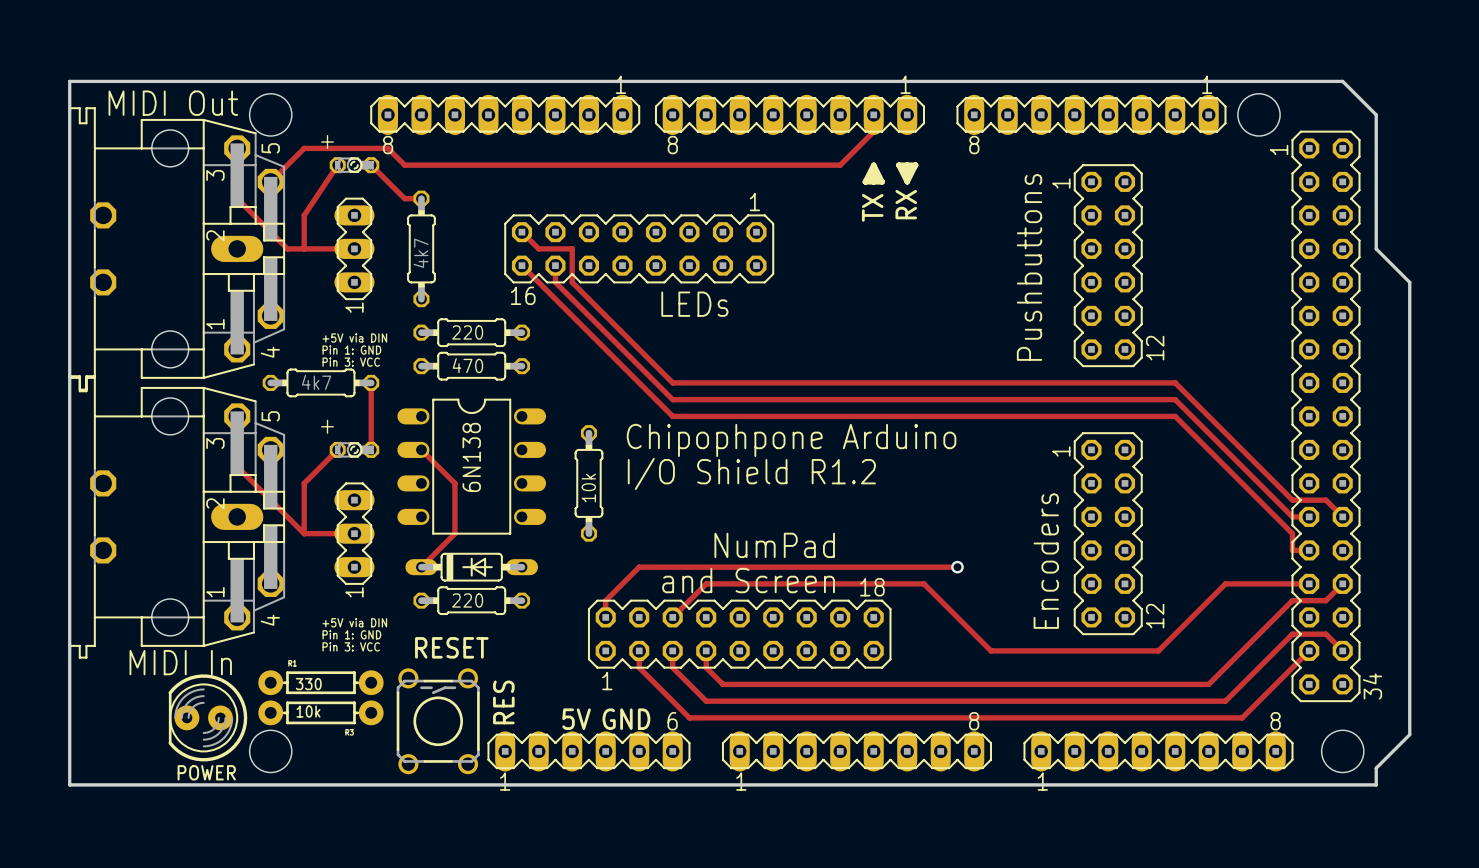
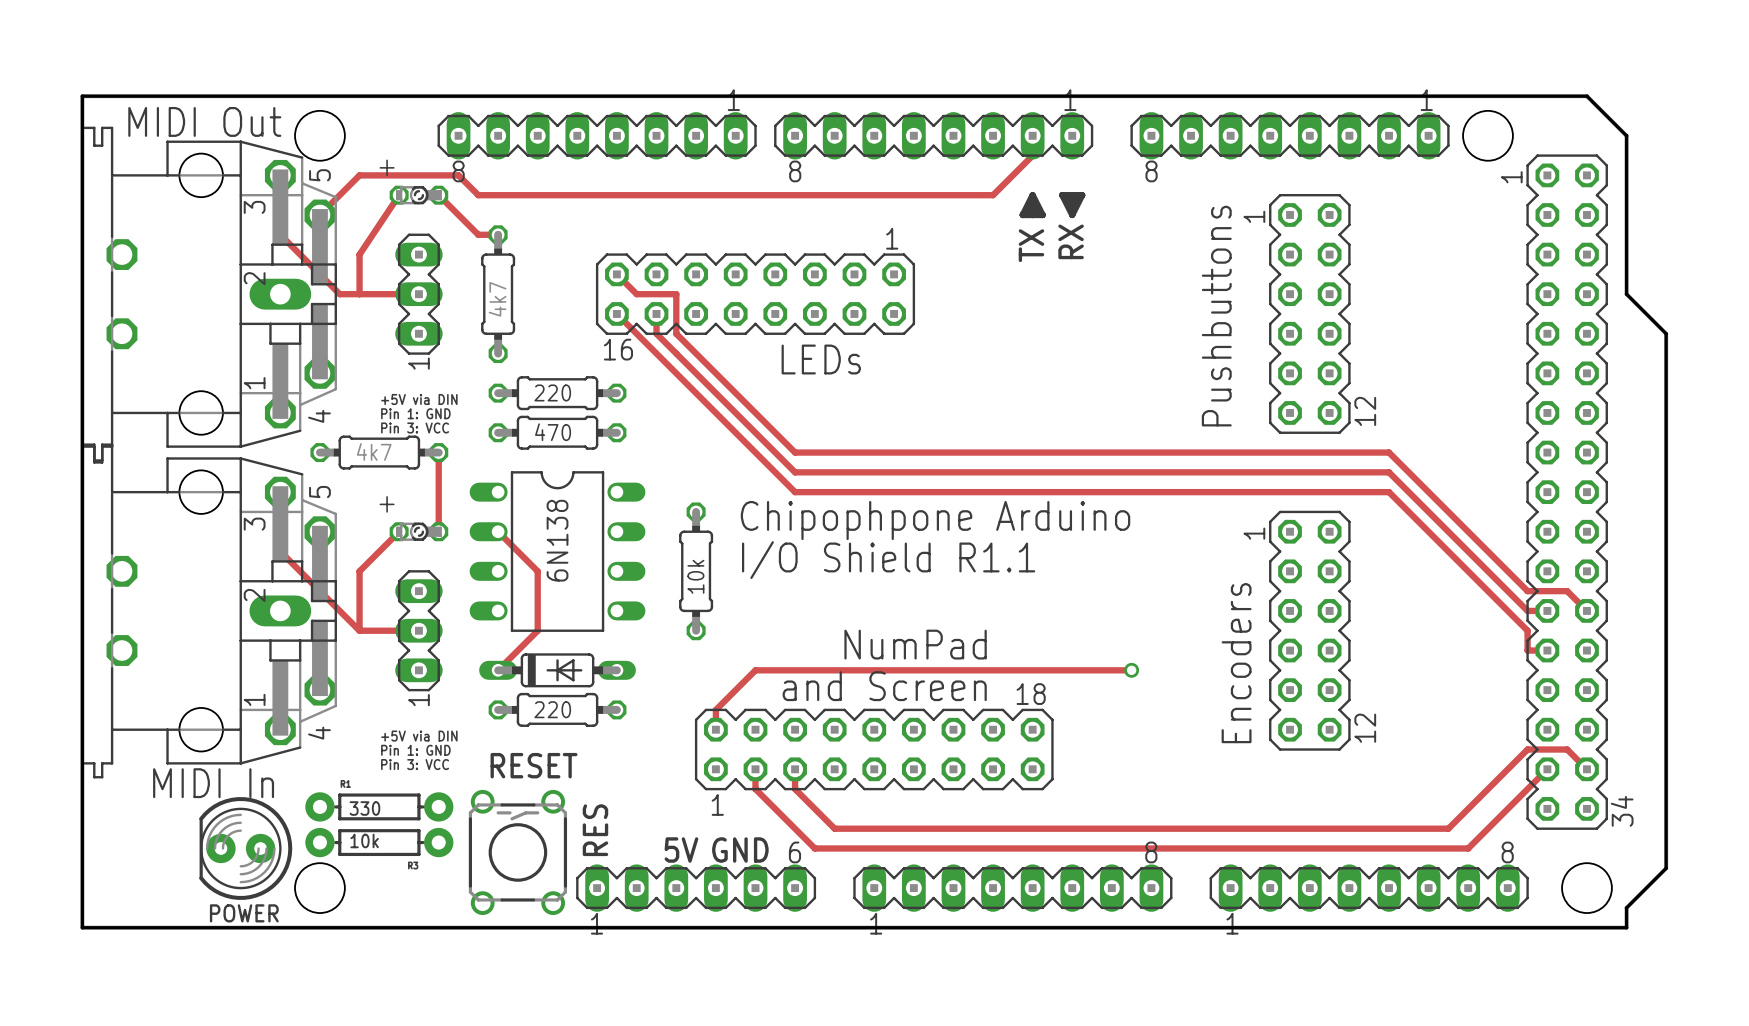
text: I/O Shield R1.2 (751, 473) -> I/O Shield R1.1 (888, 560)
track: (1309, 583) (1225, 583) (1158, 650) (990, 650) (923, 583) (706, 583) (672, 617) -> none
track: (1342, 583) (1325, 600) (1292, 600) (1208, 684) (722, 684) (706, 667) (706, 650) -> none

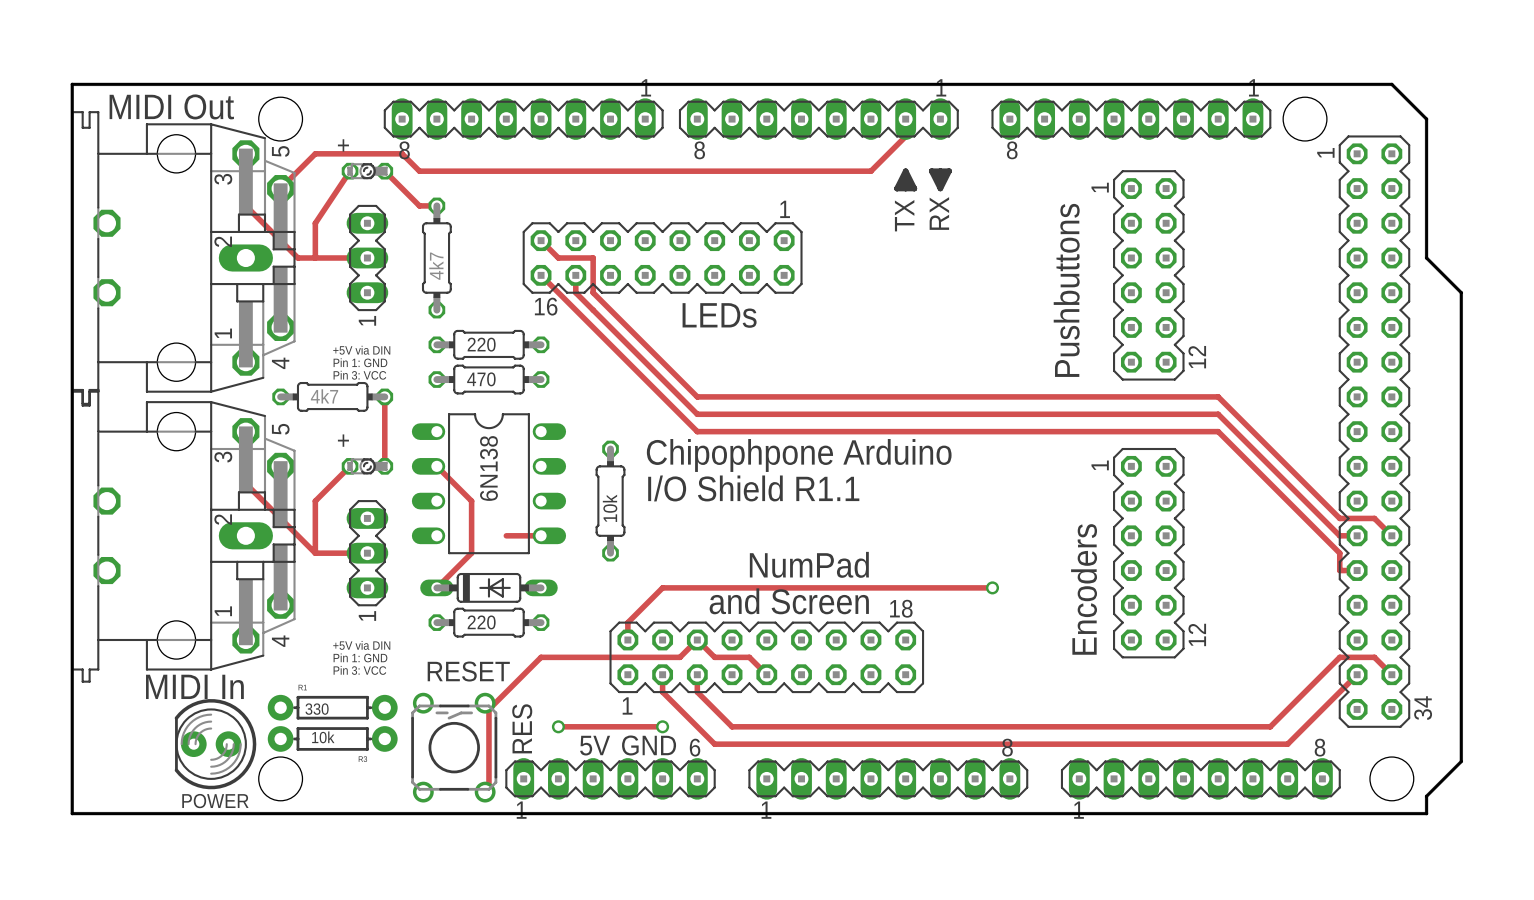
track: none -> (506, 535) (541, 535)
track: none -> (766, 674) (749, 657) (714, 657) (697, 639) (679, 657) (541, 657) (488, 709) (488, 796)
track: none -> (558, 726) (662, 726)
via: none -> (558, 726)
via: none -> (662, 726)

